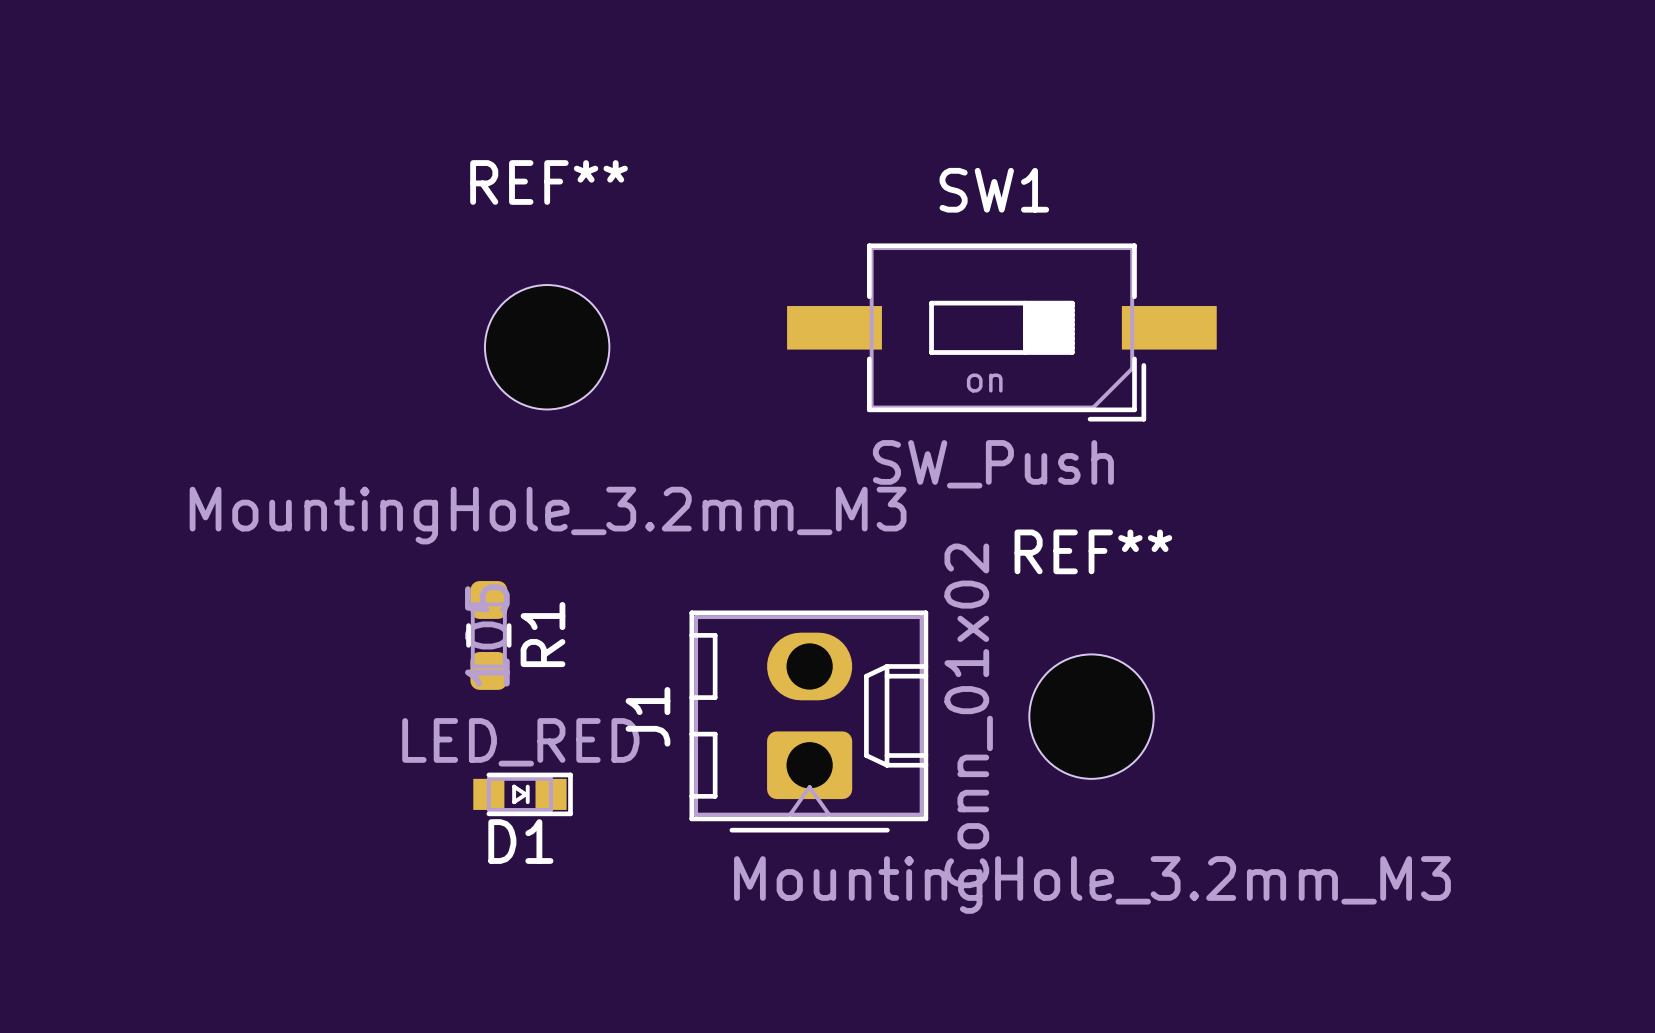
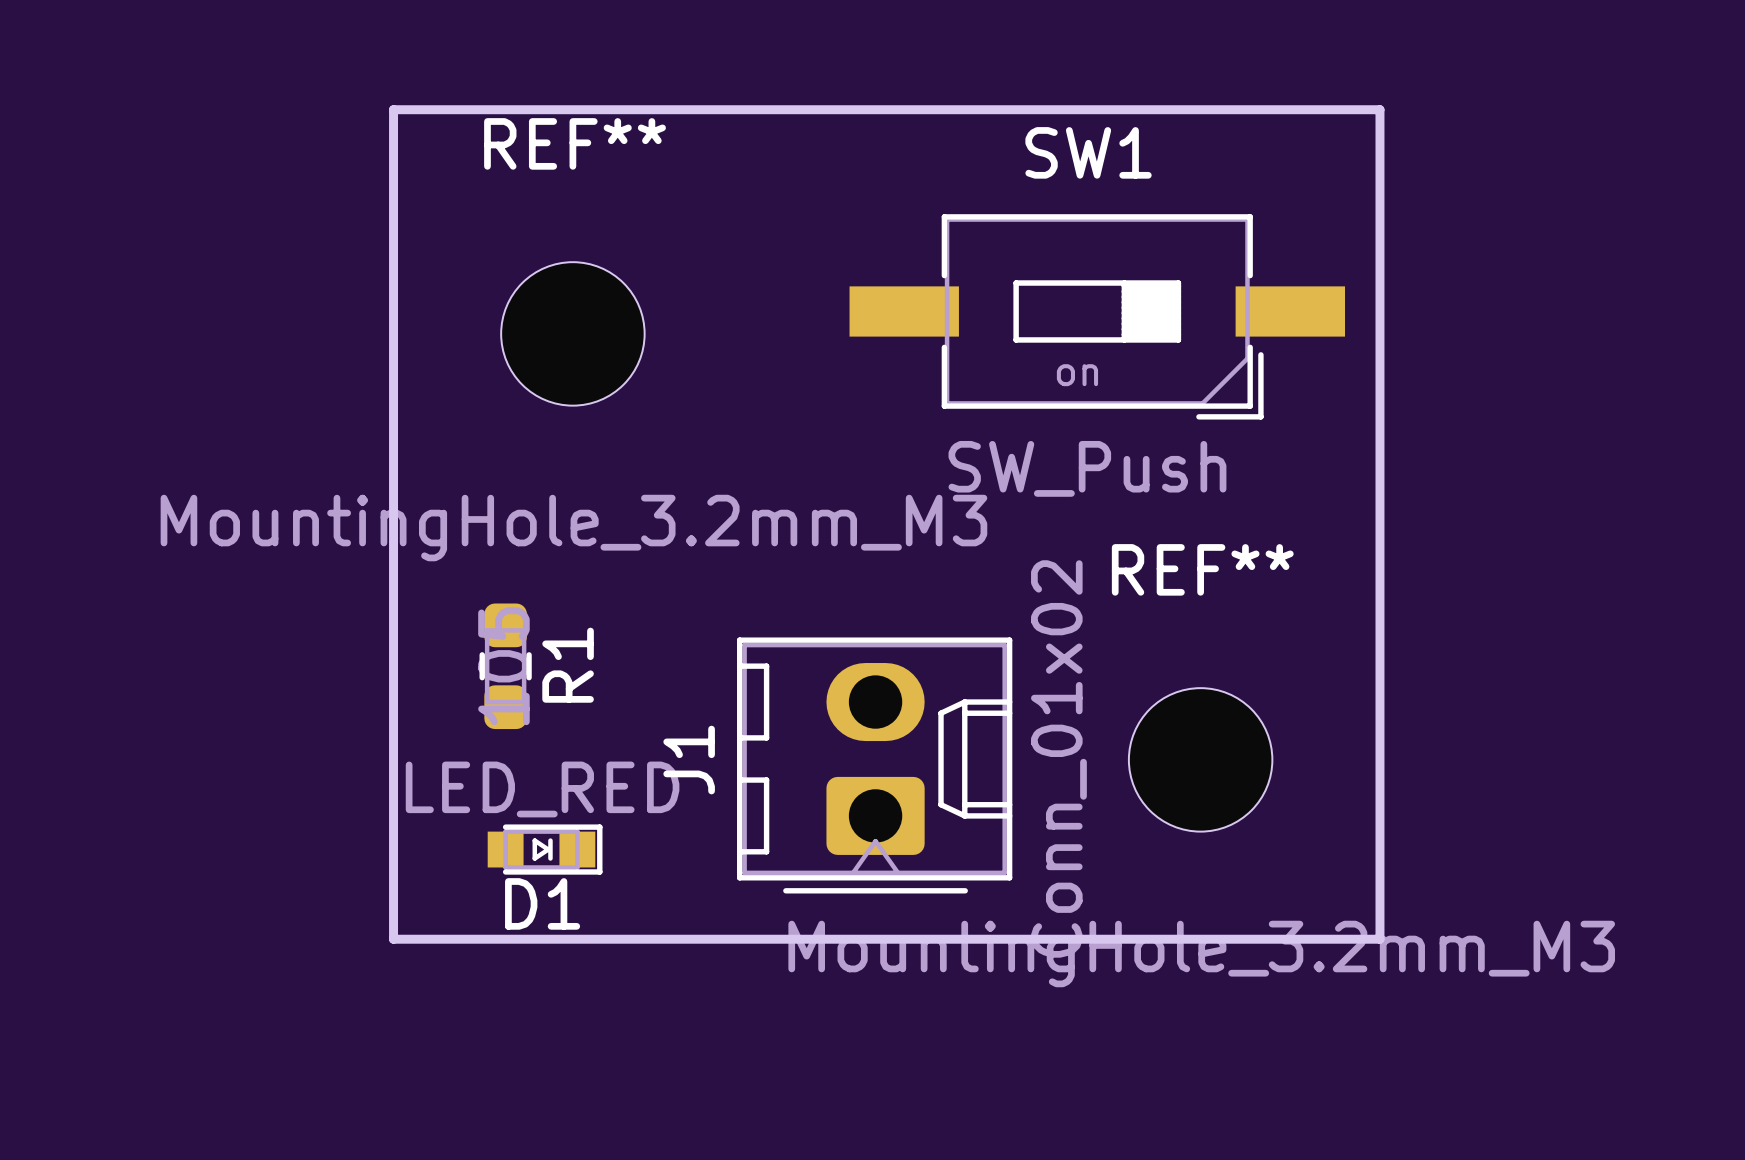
board edge: none -> (393, 109) (1379, 109) (1379, 939) (393, 939) (393, 109)

